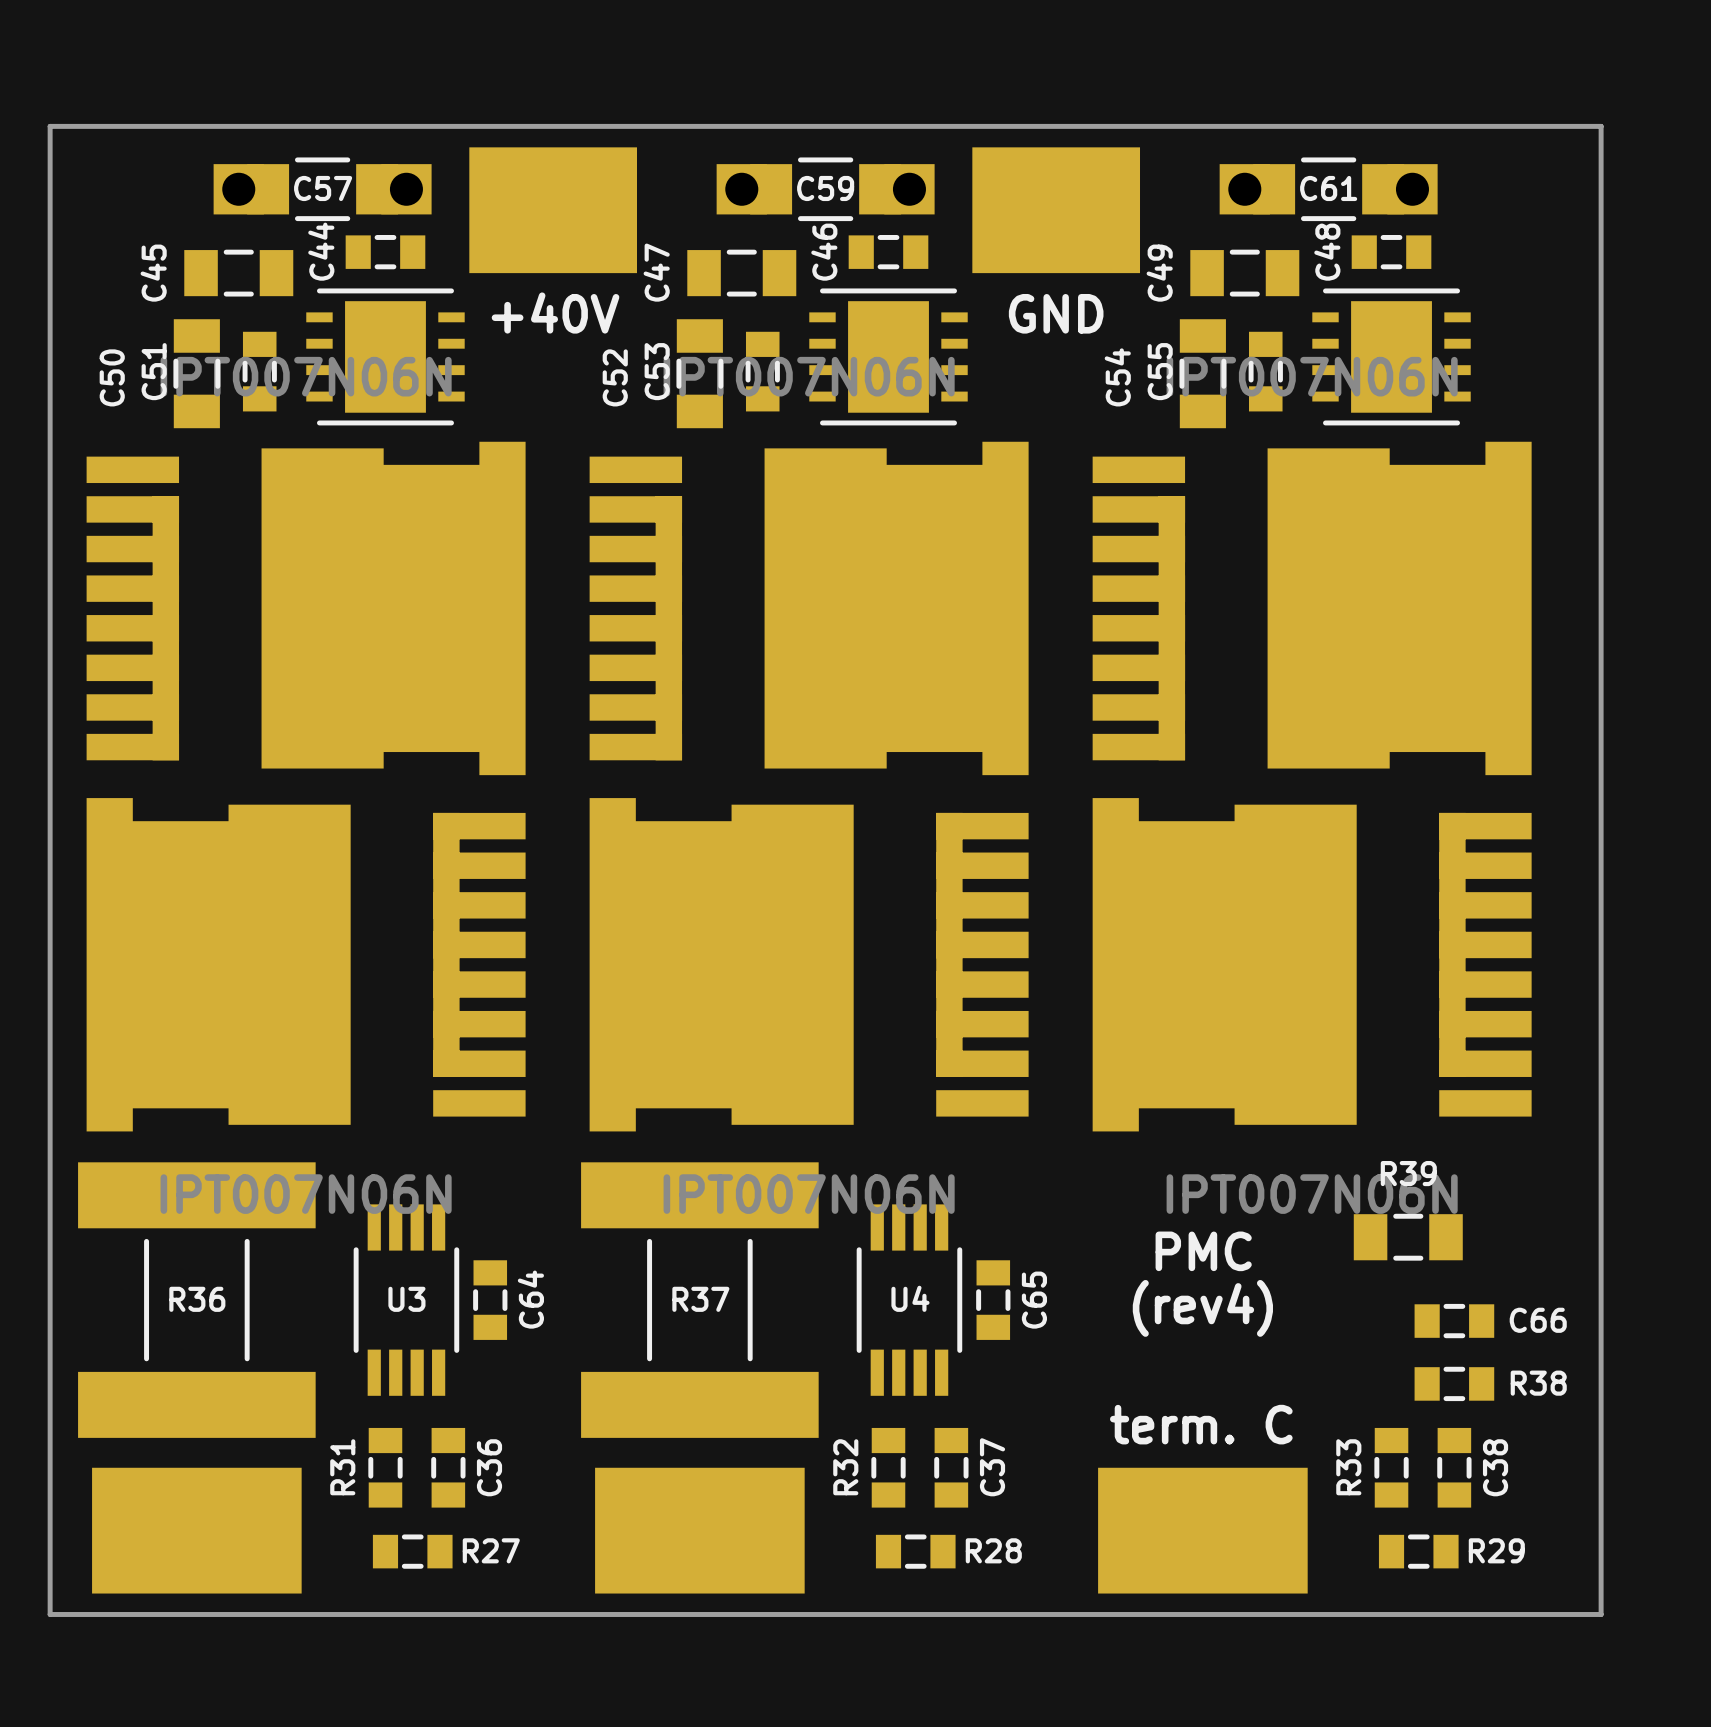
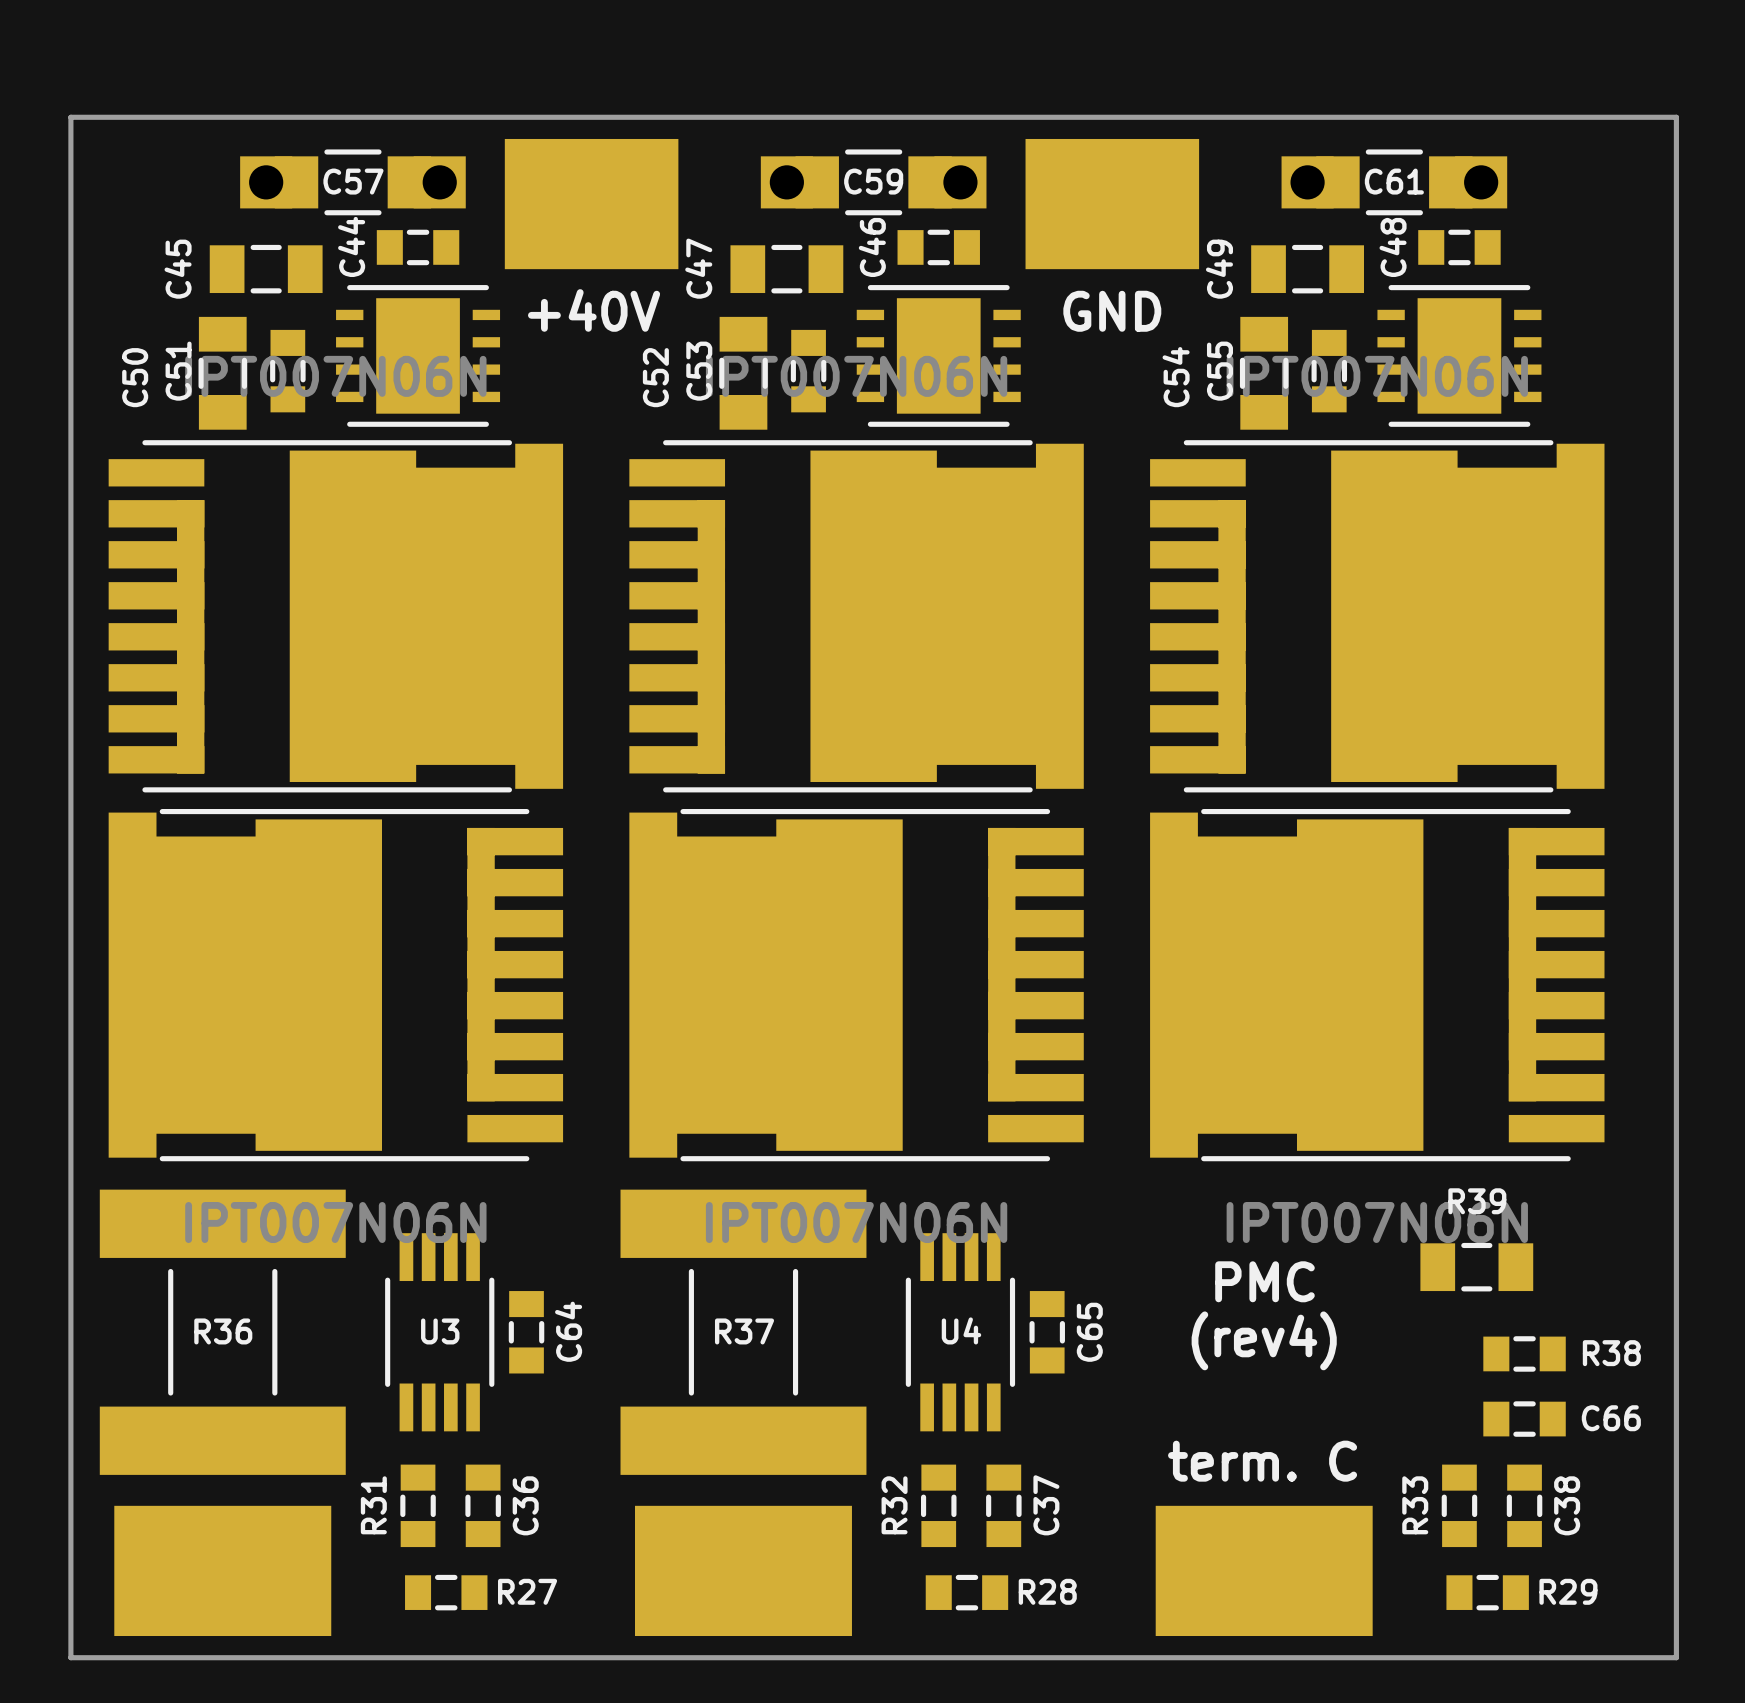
part footprint: [86, 441, 526, 776] -> [108, 440, 564, 793]
part footprint: [589, 441, 1029, 776] -> [629, 440, 1084, 793]
part footprint: [1092, 441, 1532, 776] -> [1150, 440, 1605, 793]
part footprint: [86, 798, 526, 1132] -> [108, 808, 564, 1162]
part footprint: [589, 798, 1029, 1132] -> [629, 808, 1084, 1162]
part footprint: [1092, 798, 1532, 1132] -> [1150, 808, 1605, 1162]
C66 name position: C66 (1538, 1320) -> C66 (1611, 1418)
R38 name position: R38 (1538, 1383) -> R38 (1611, 1353)

